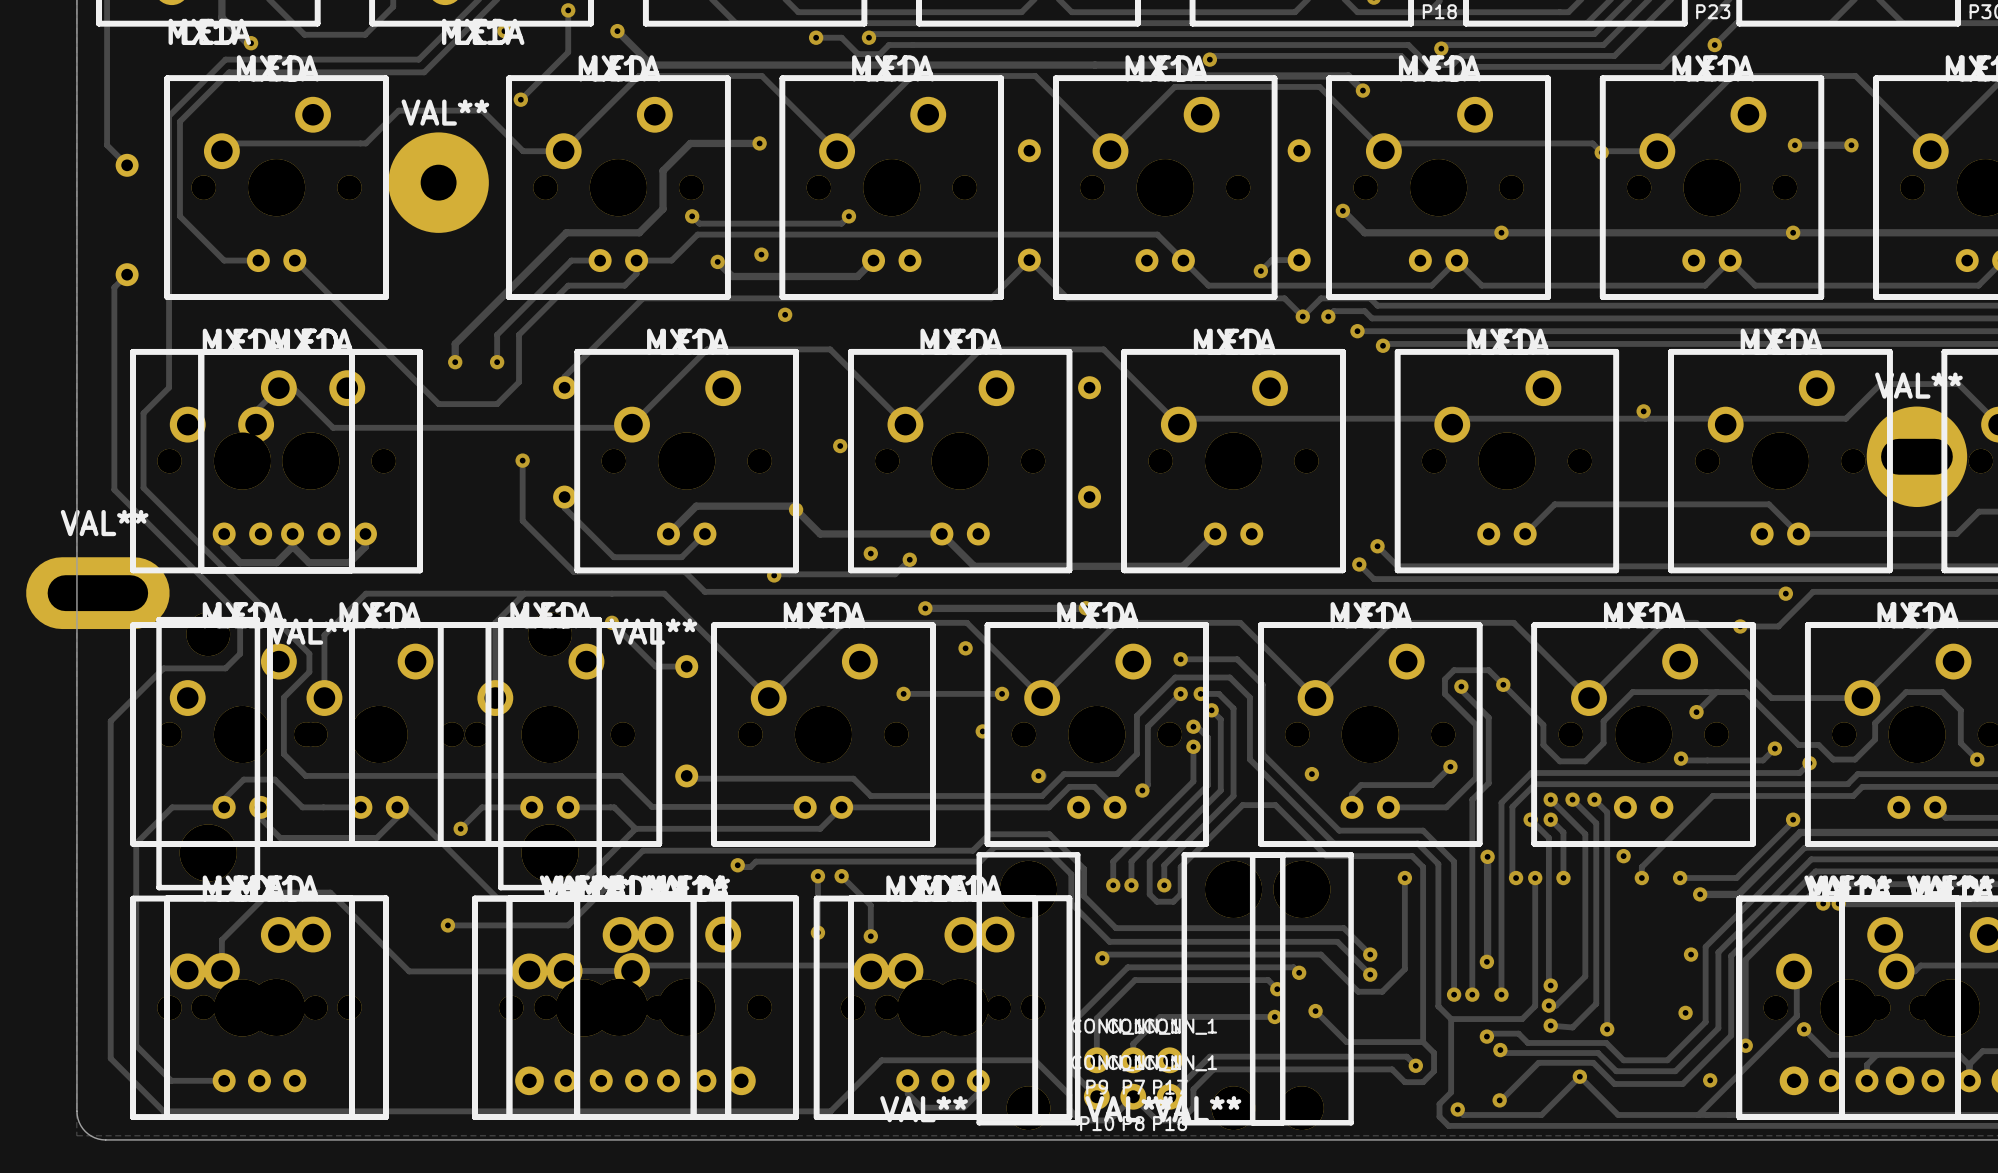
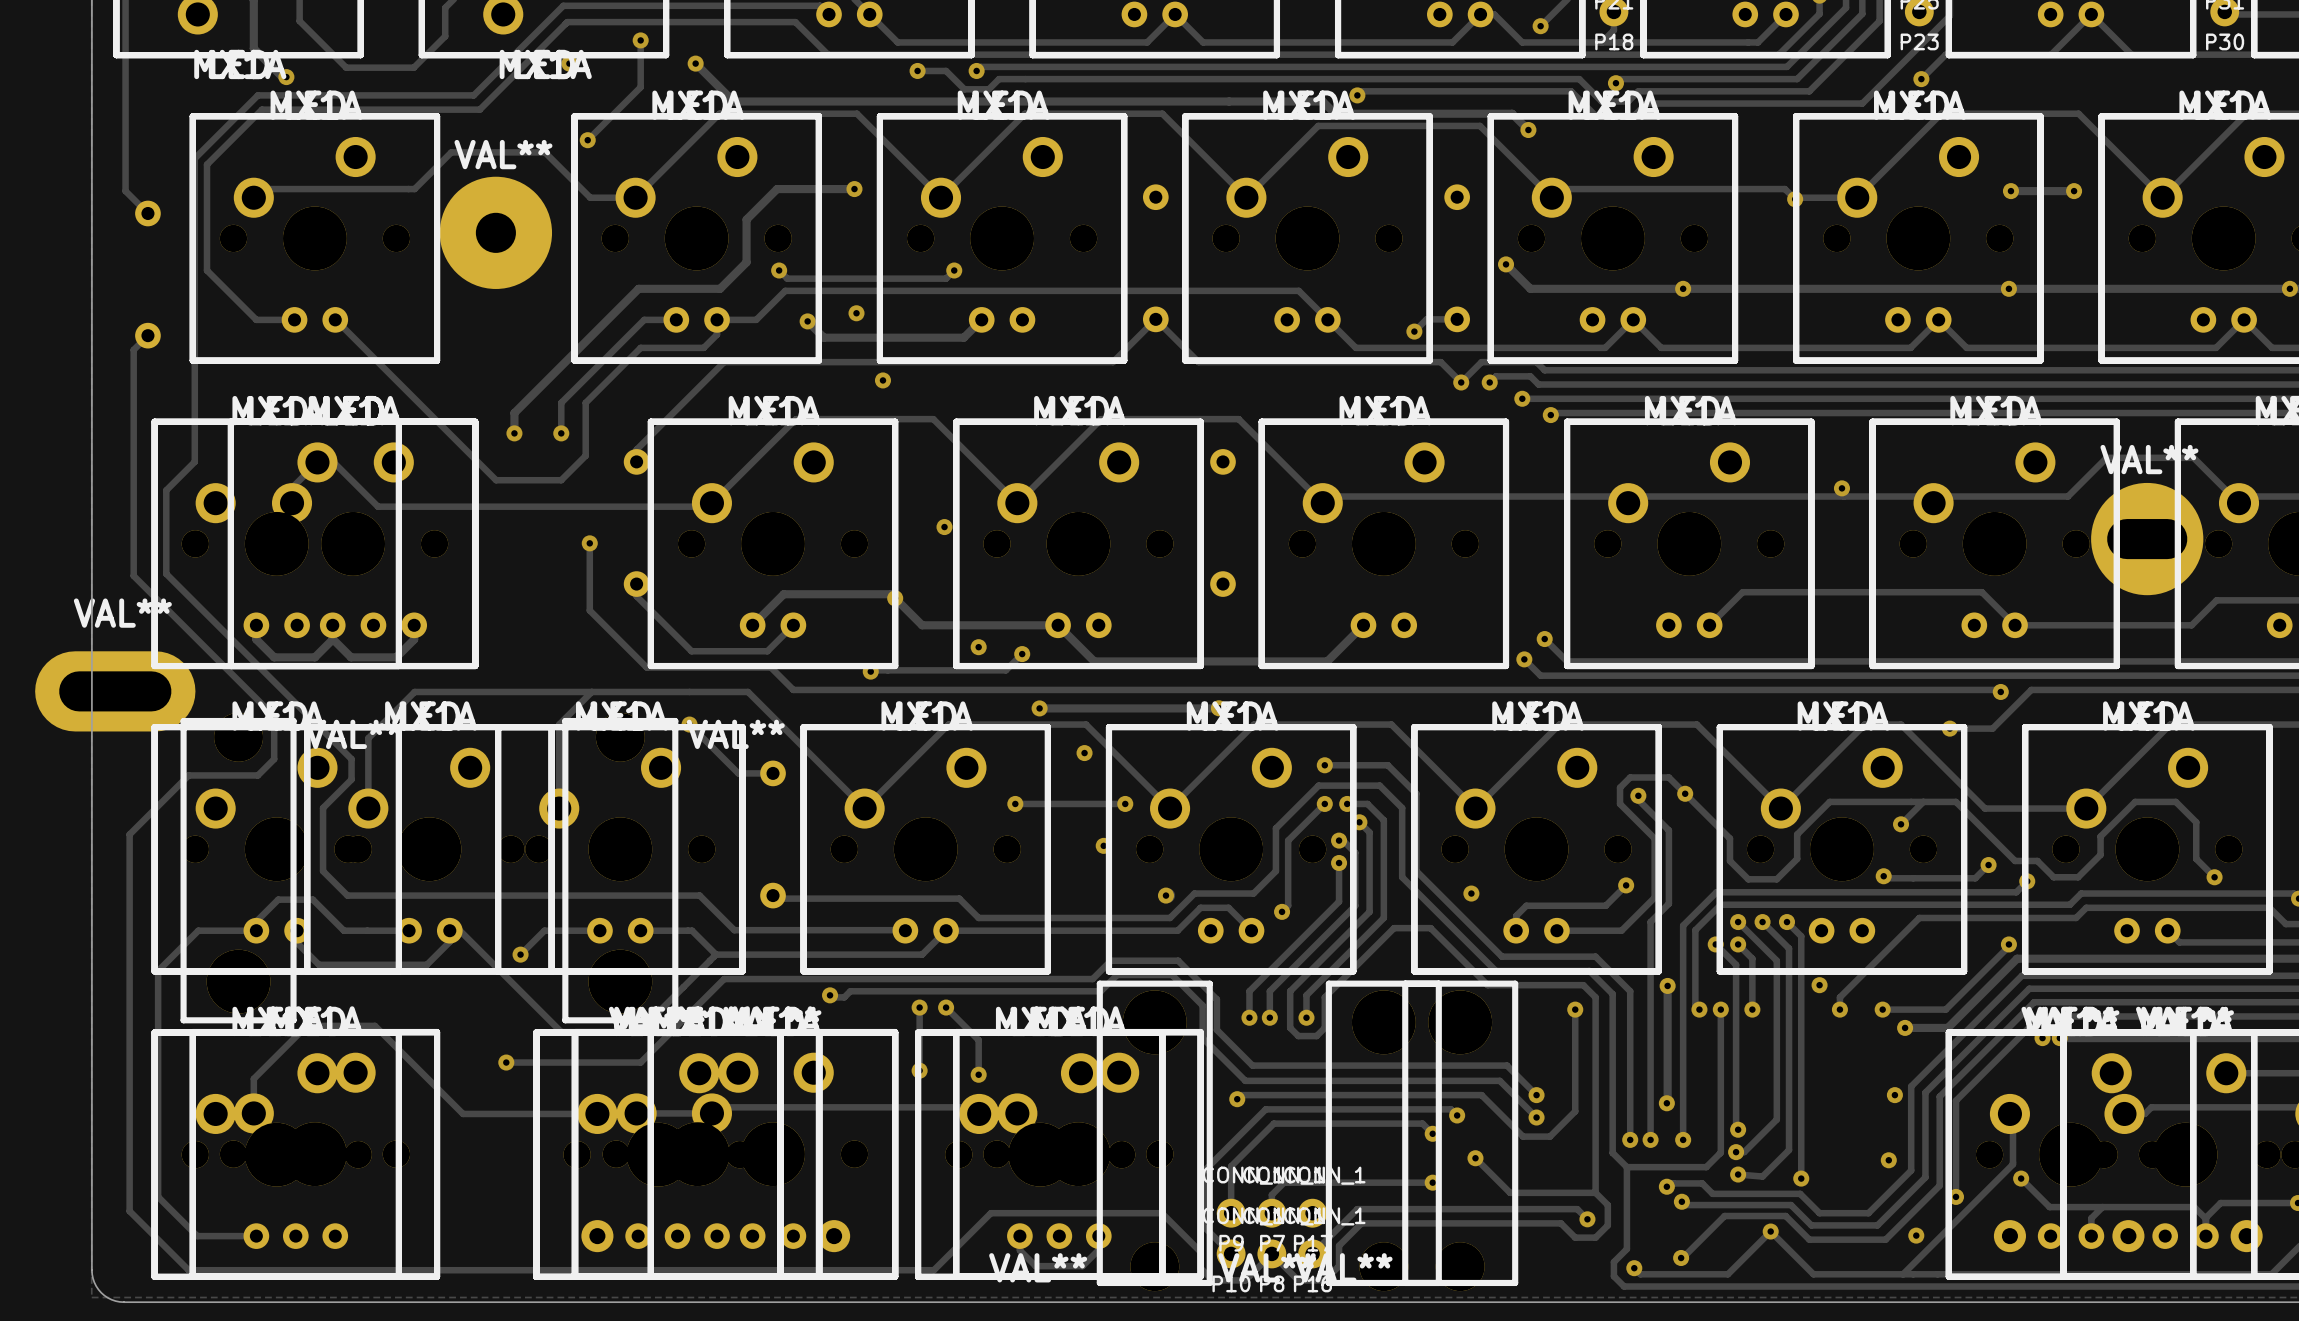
track: (1274, 1016) (1160, 1016) (1144, 1032) -> (1432, 1182) (1284, 1182)
via position: (1274, 1016) -> (1432, 1182)

